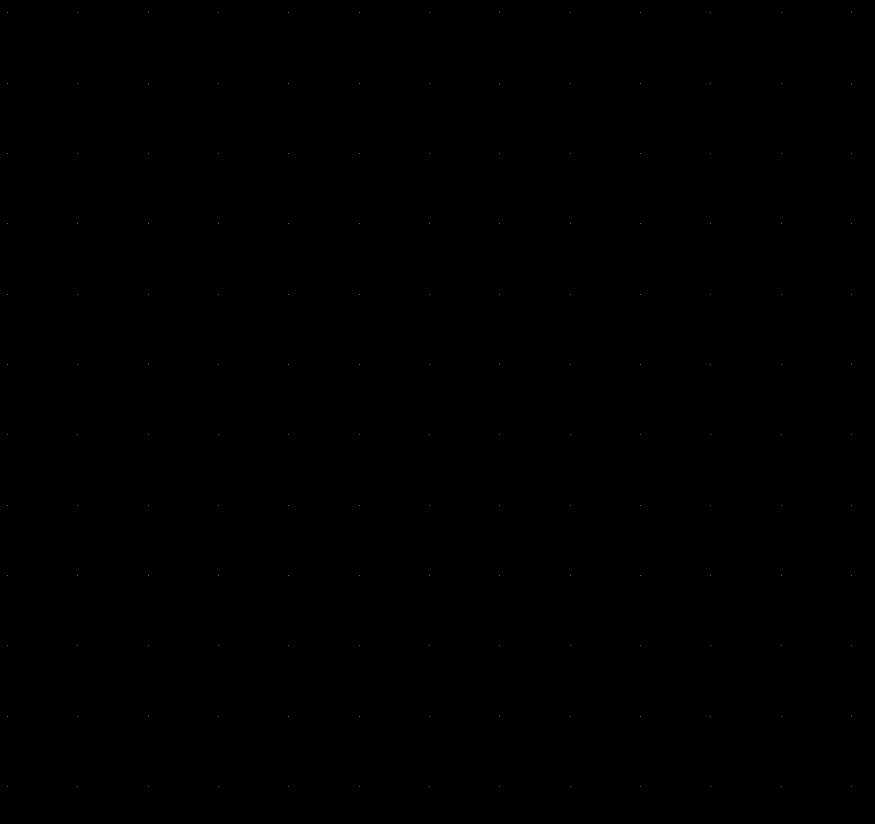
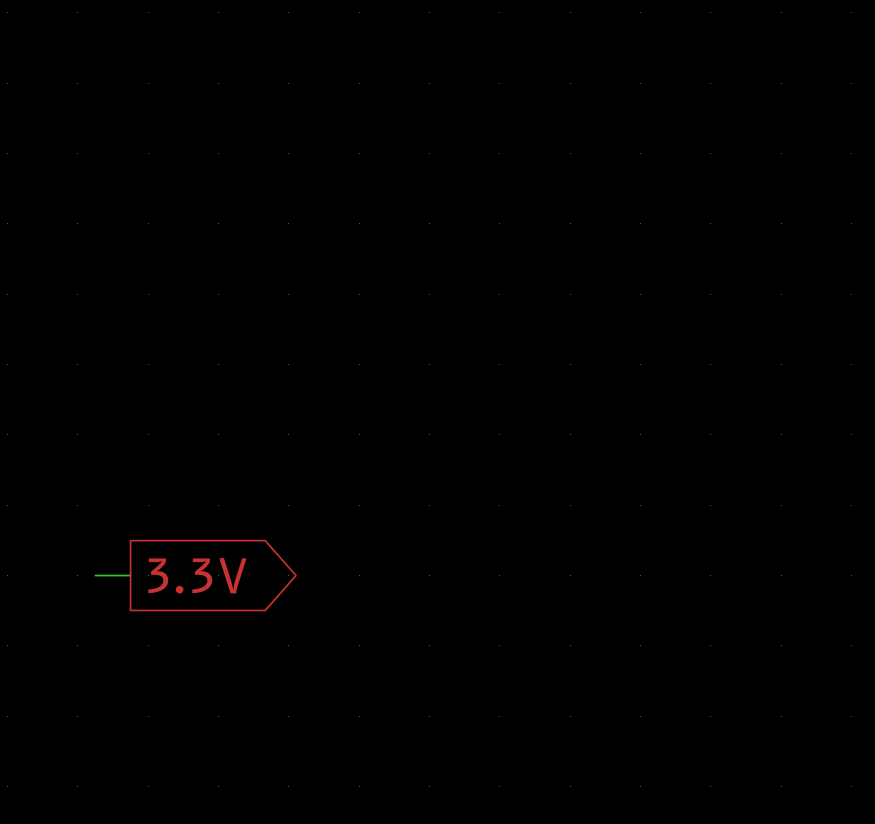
wire: none -> (95, 575) (130, 575)
global label: none -> 3.3V (197, 575)

